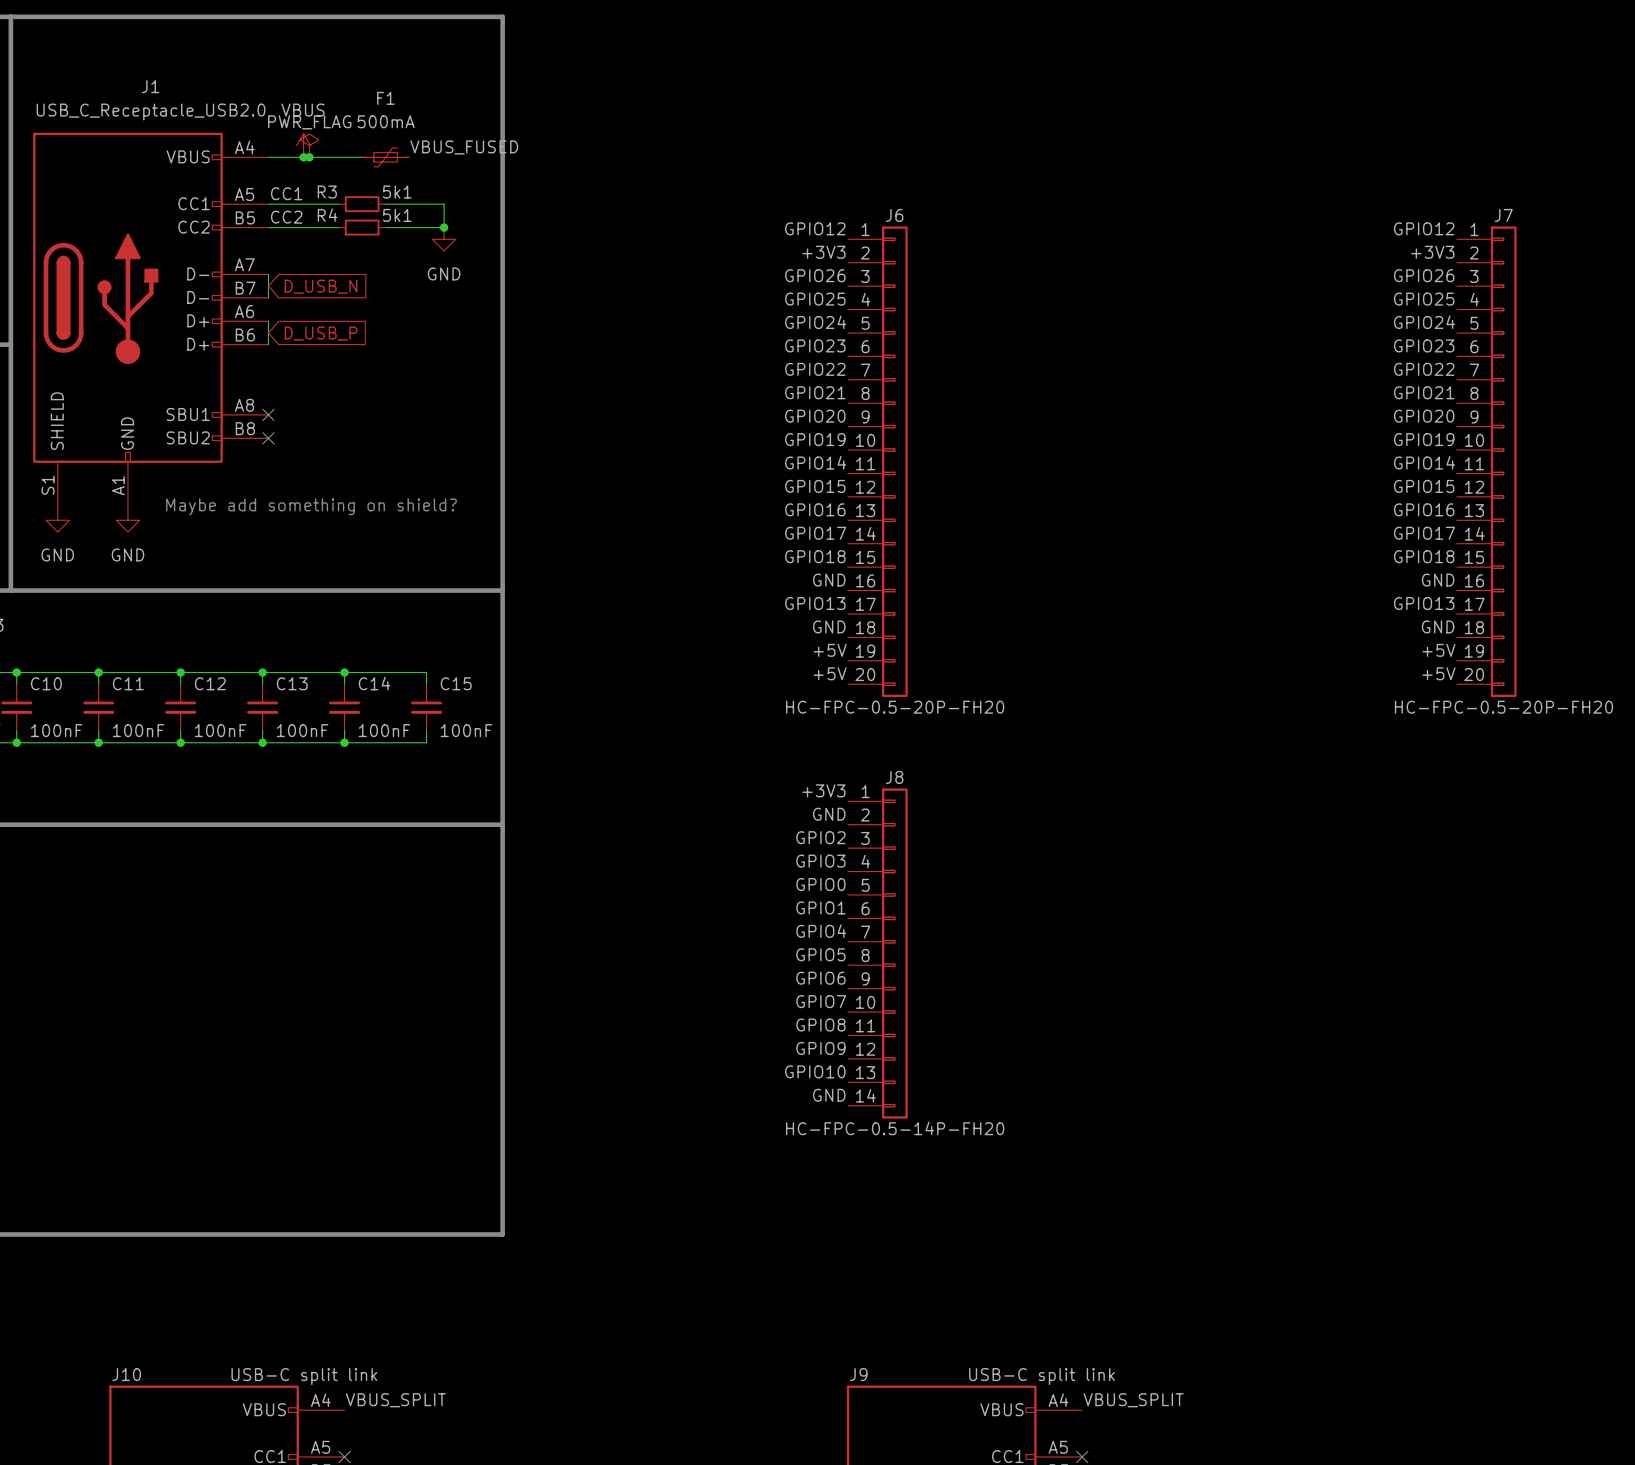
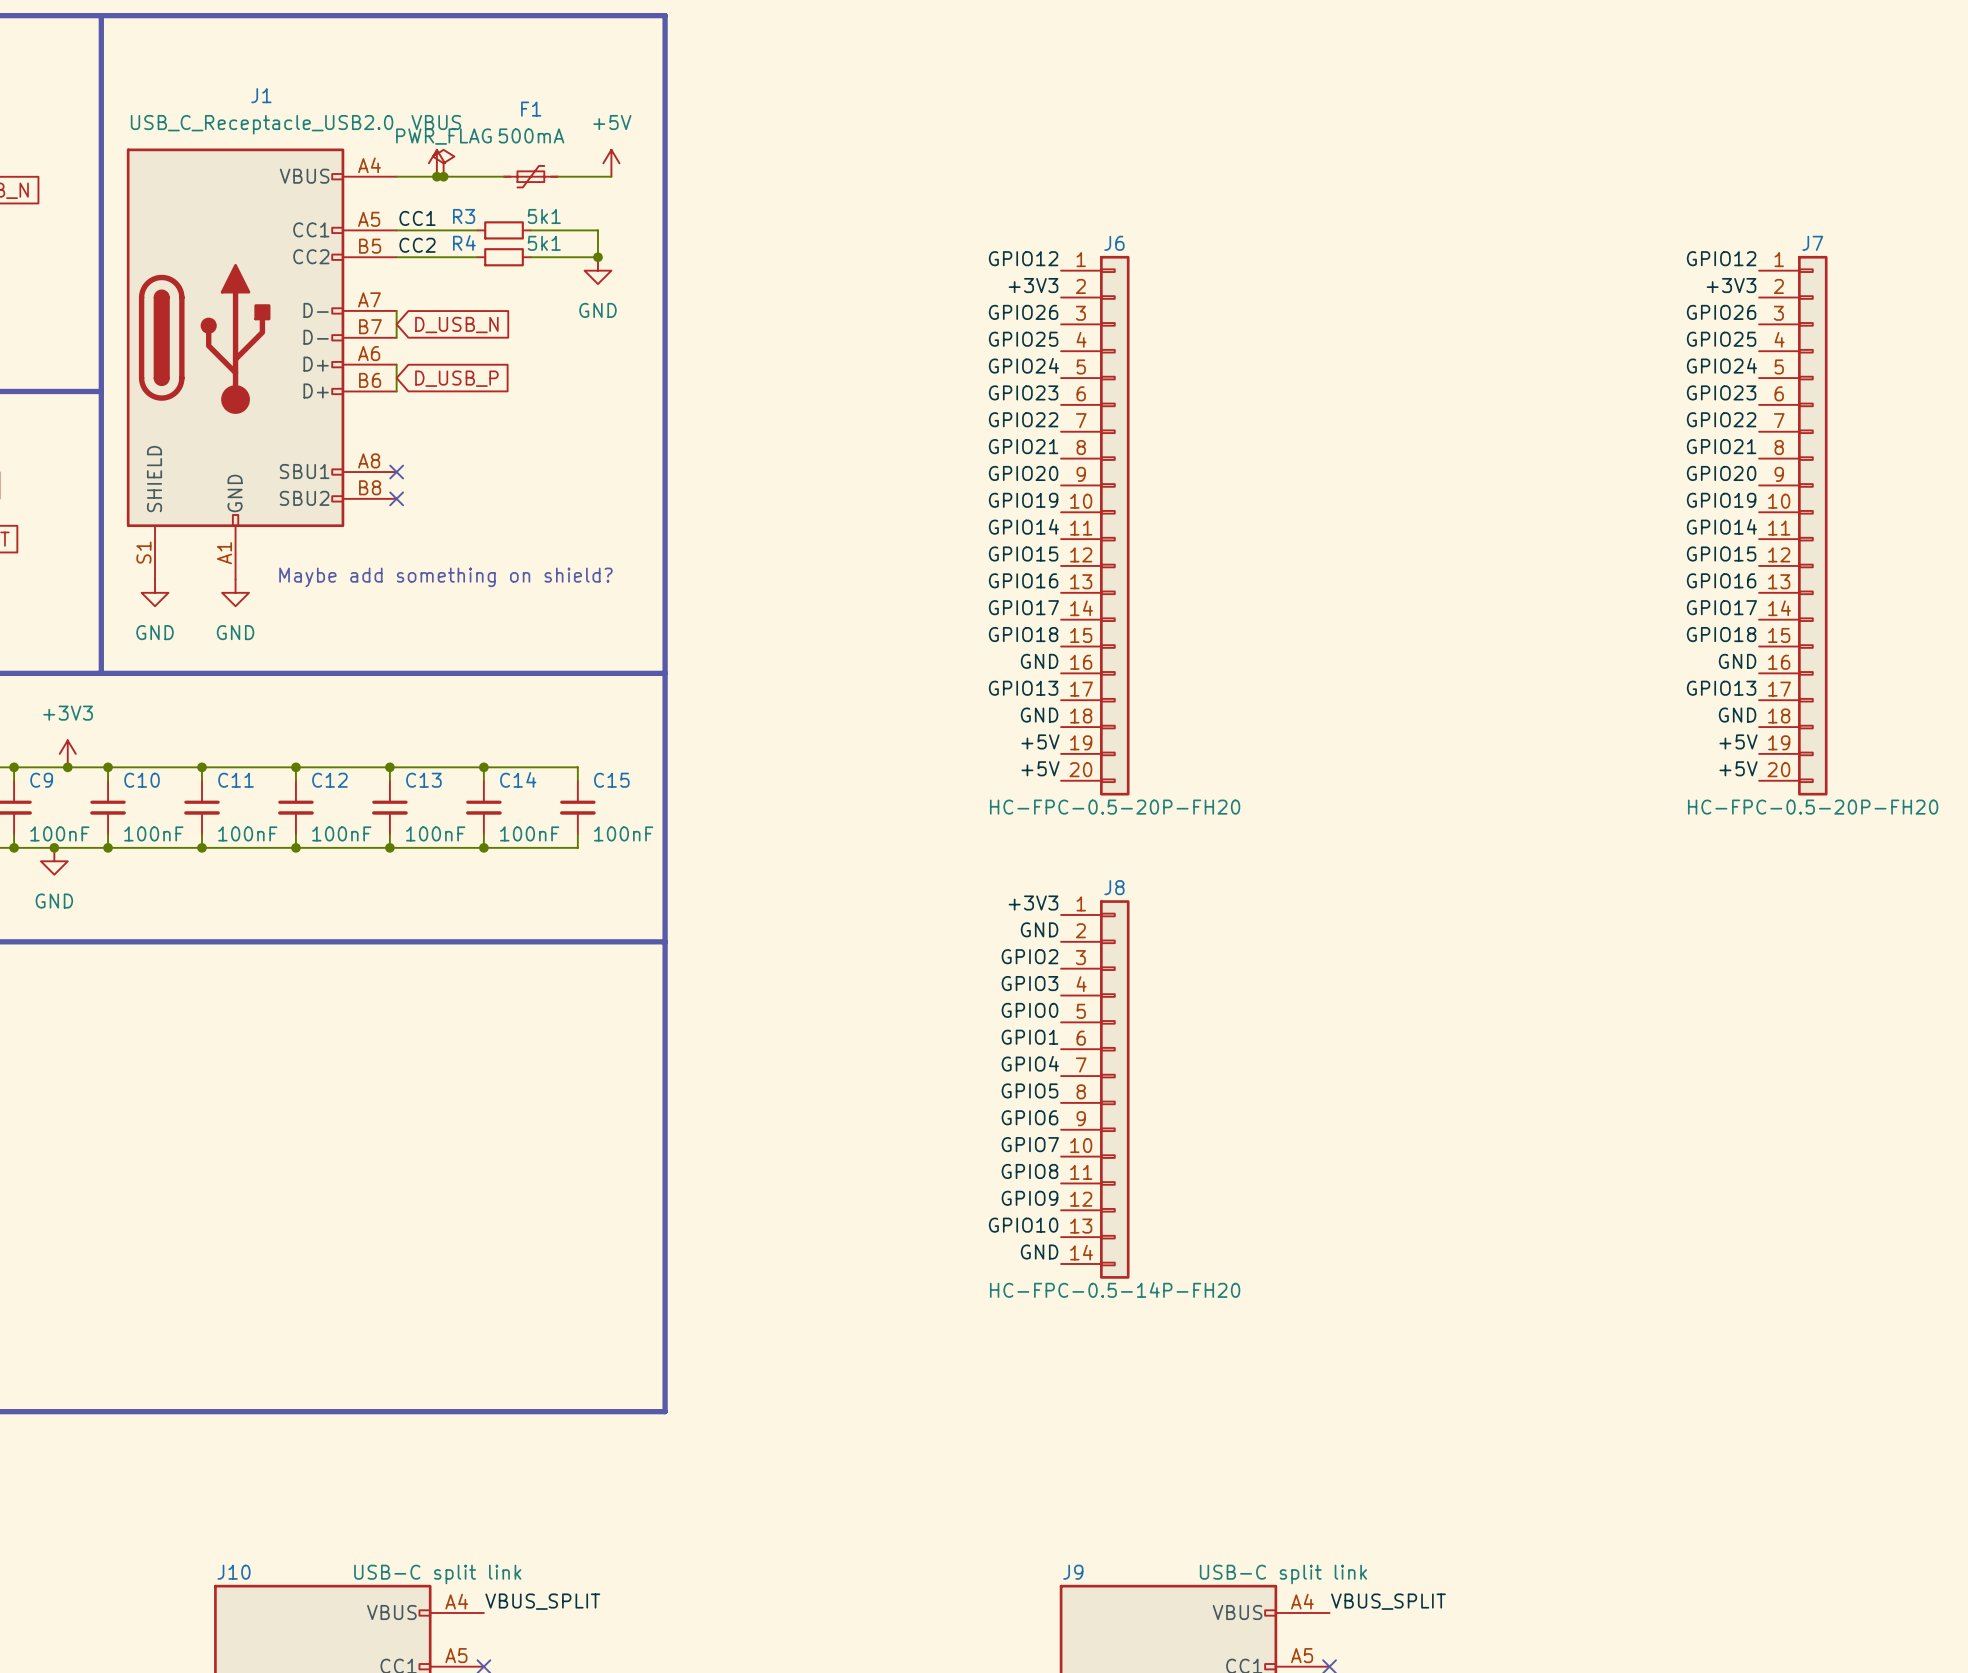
power symbol: none -> +5V (611, 163)
label: VBUS_FUSED (464, 147) -> none
wire: none -> (557, 176) (611, 176)

